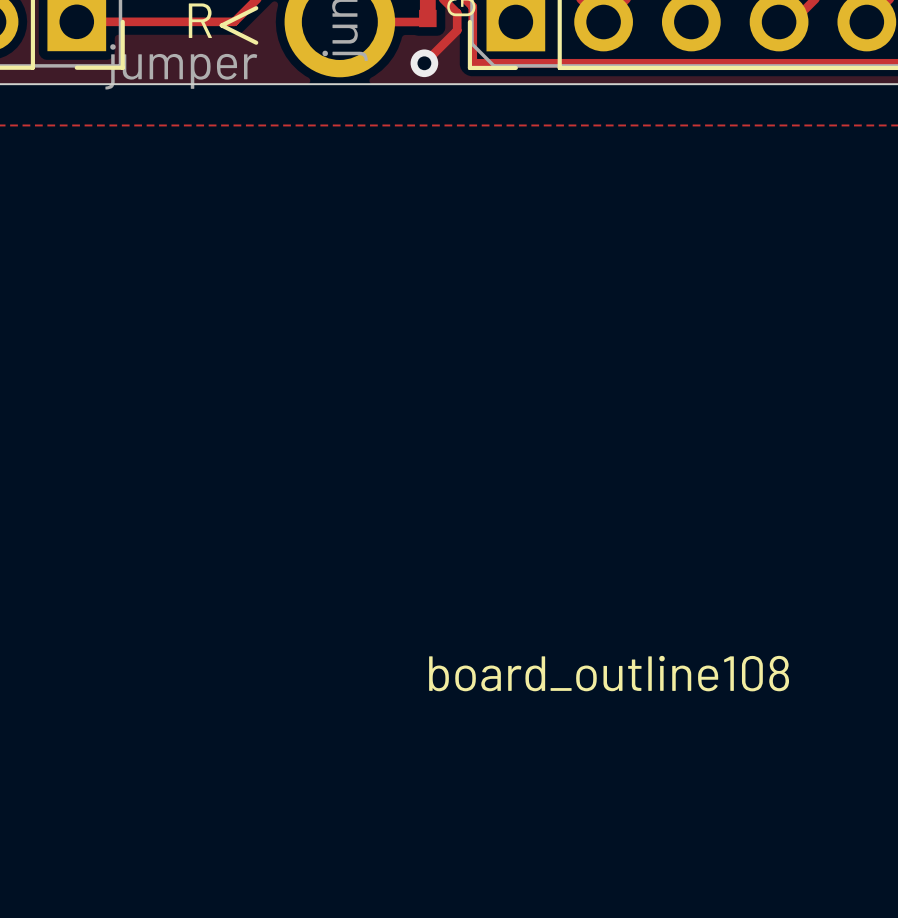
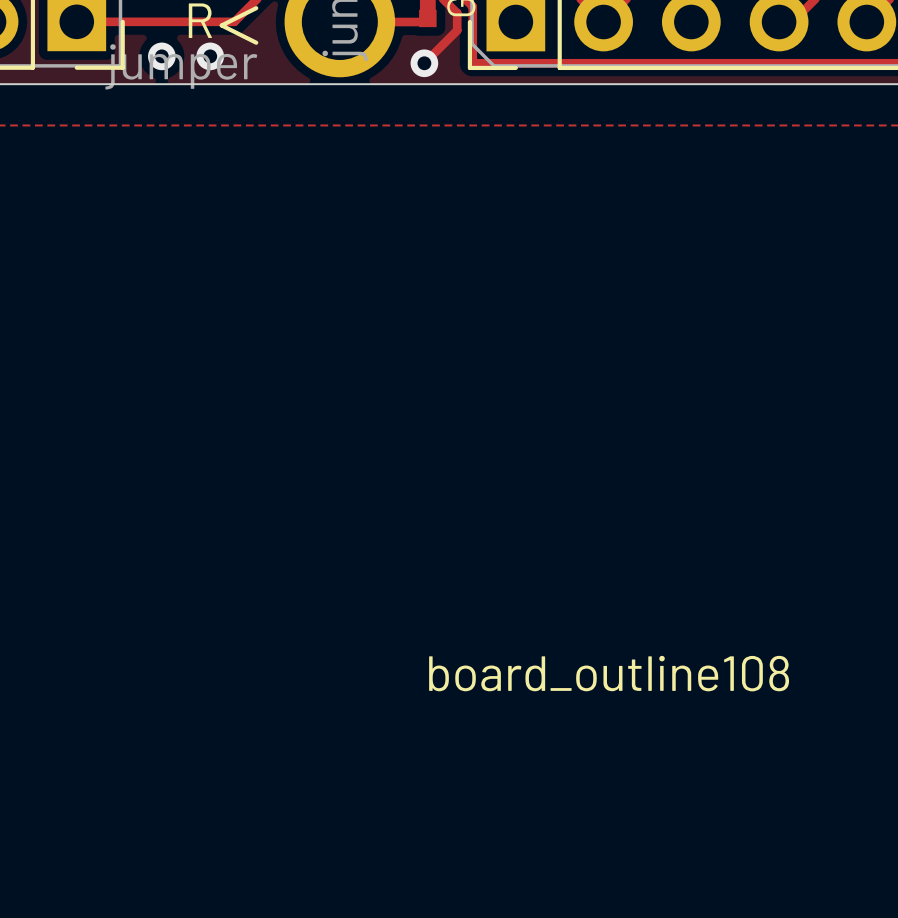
via: none -> (161, 56)
via: none -> (210, 56)

